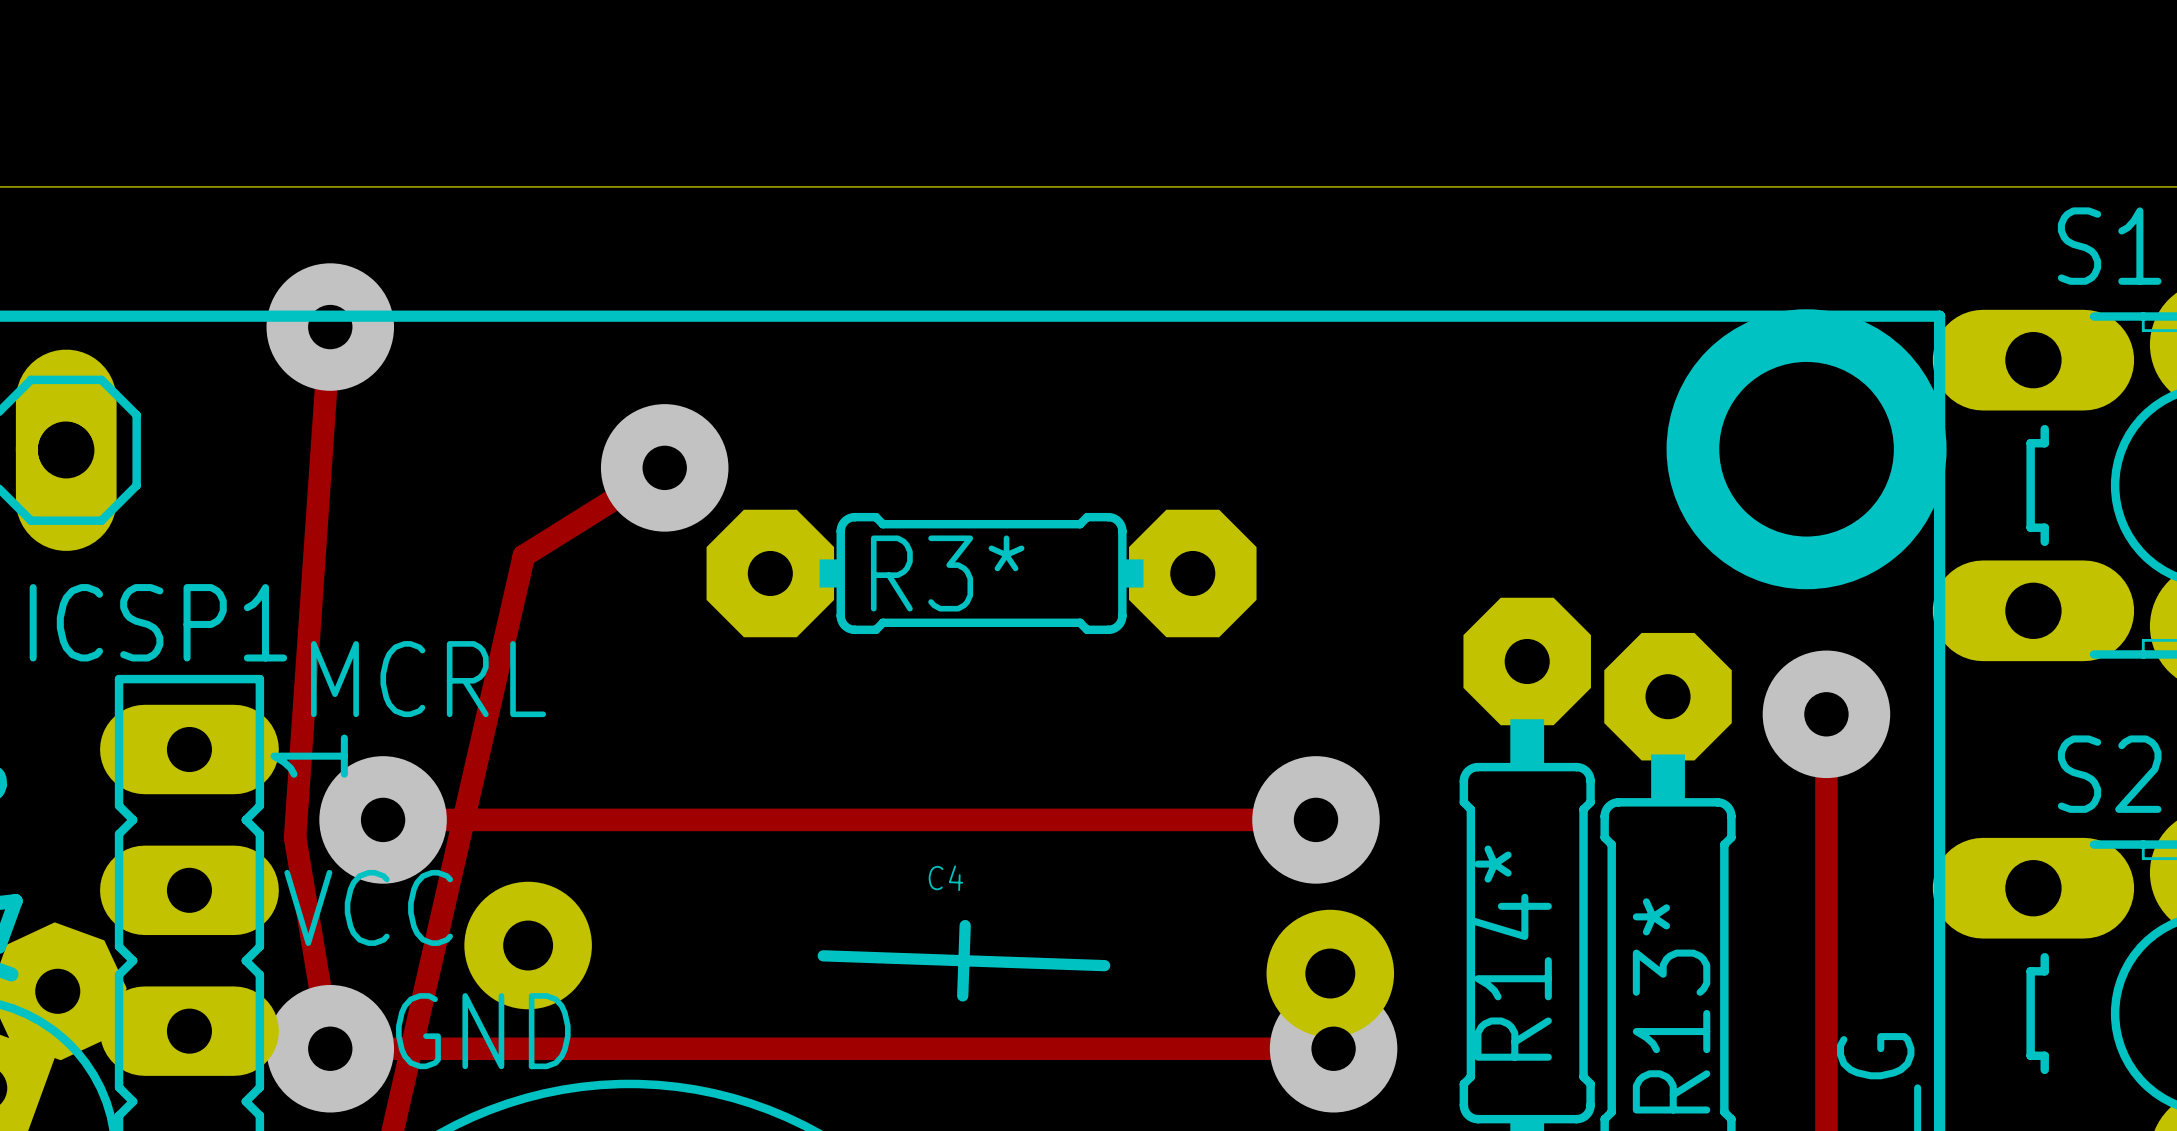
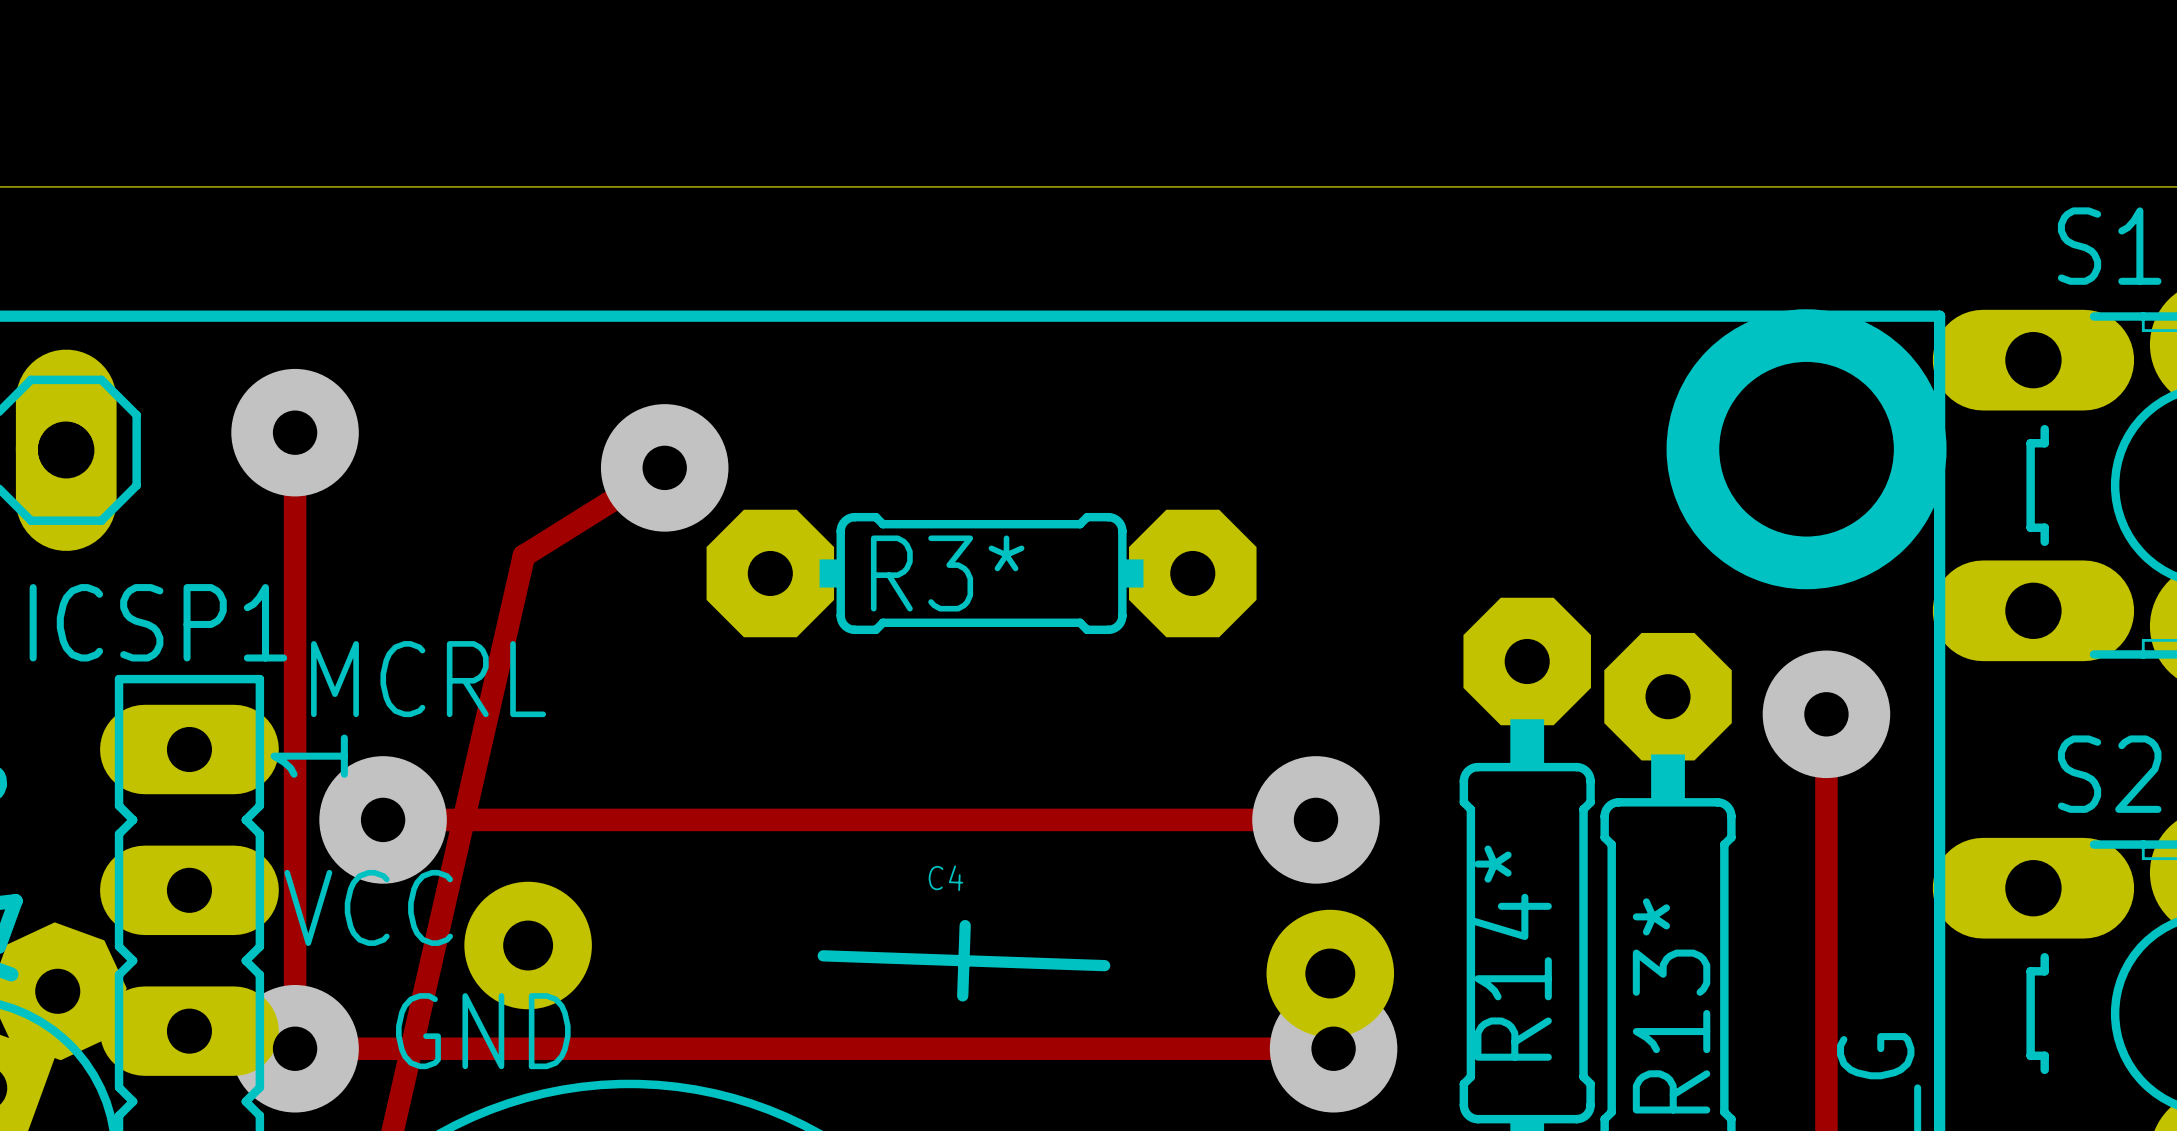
track: (330, 327) (295, 837) (330, 1048) -> (295, 432) (295, 1048) (330, 1048)
via position: (330, 327) -> (295, 432)
via position: (330, 1048) -> (295, 1048)

